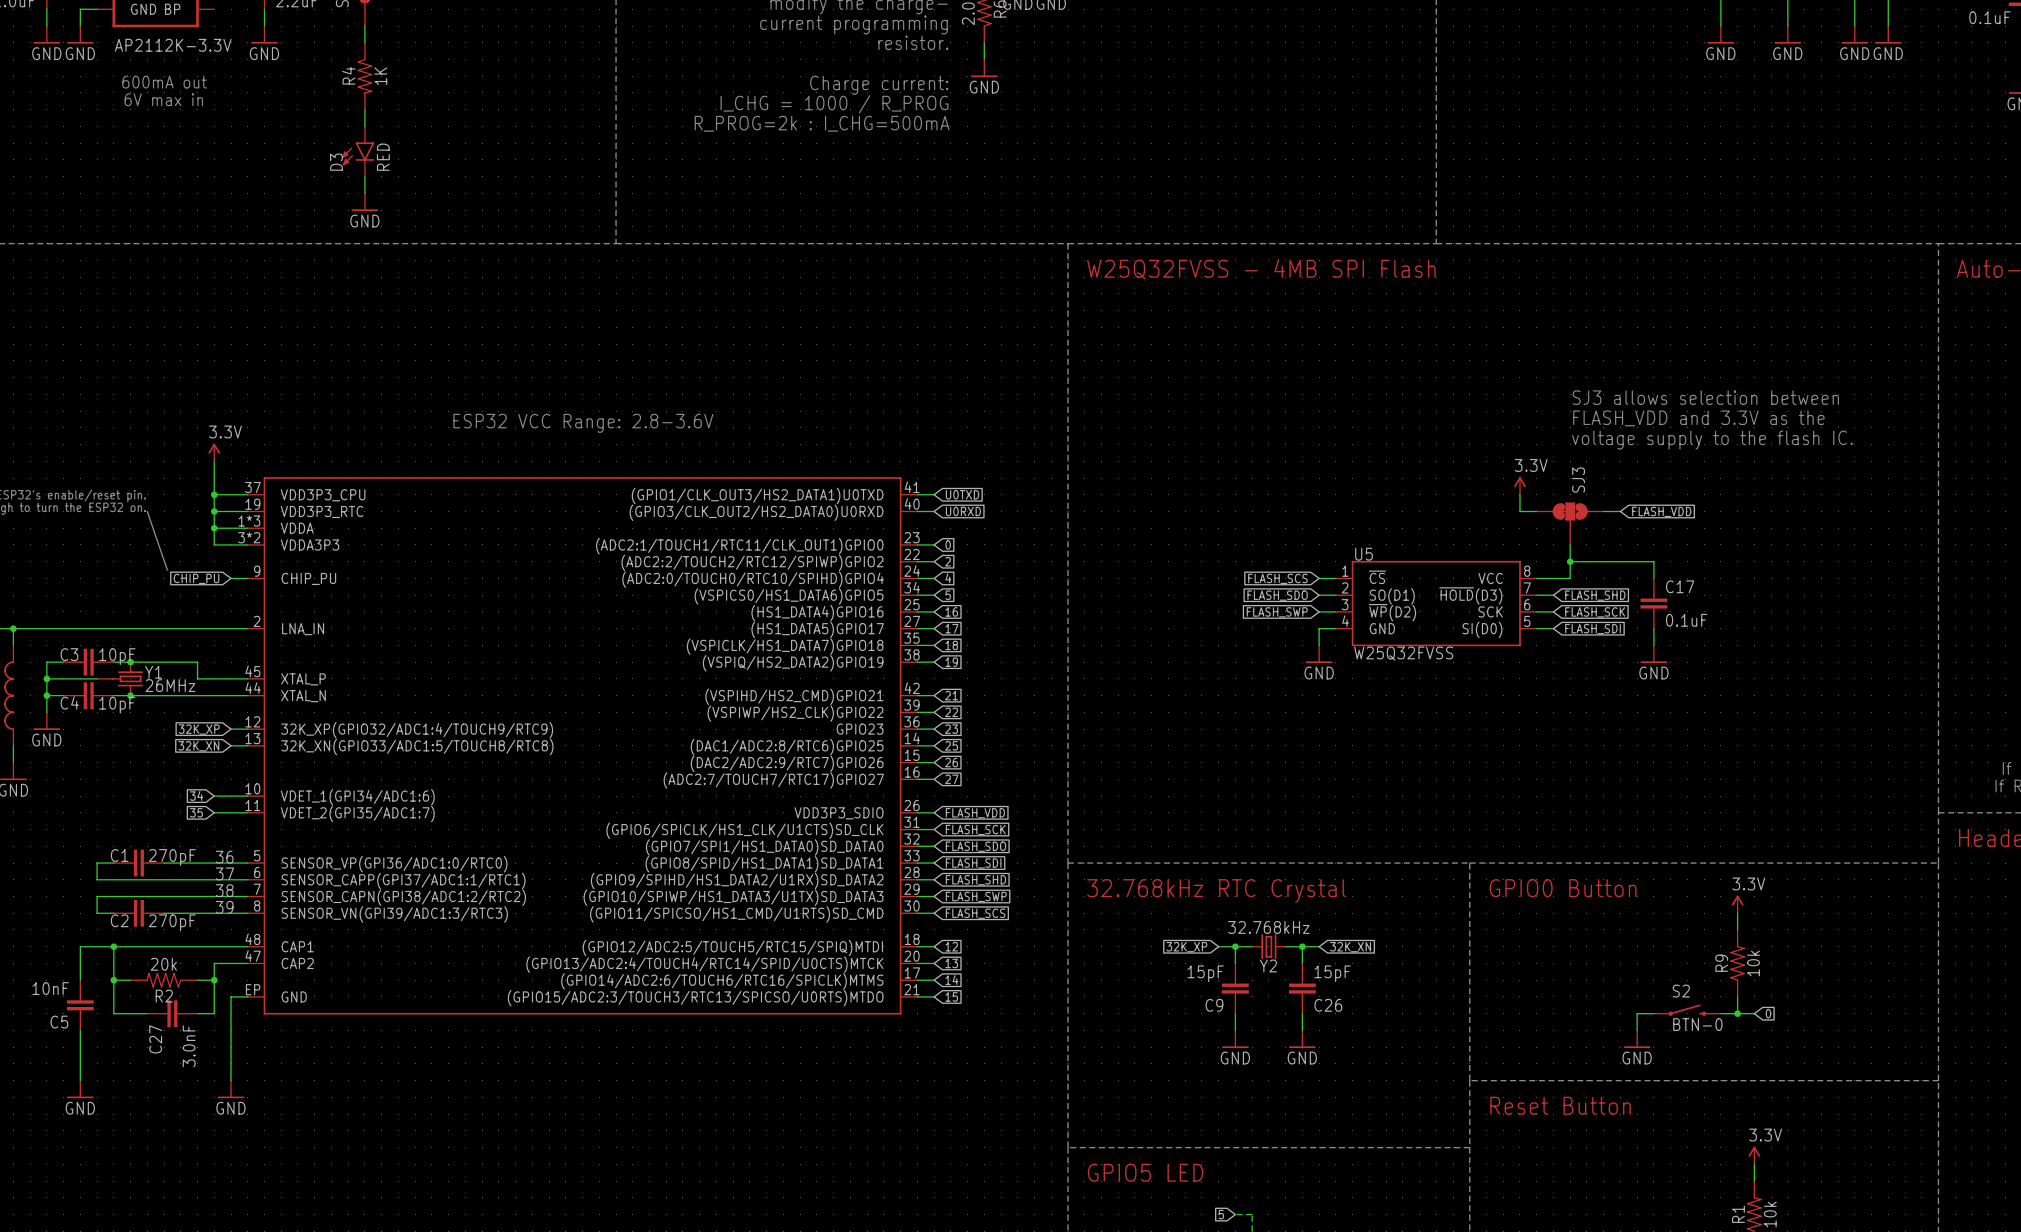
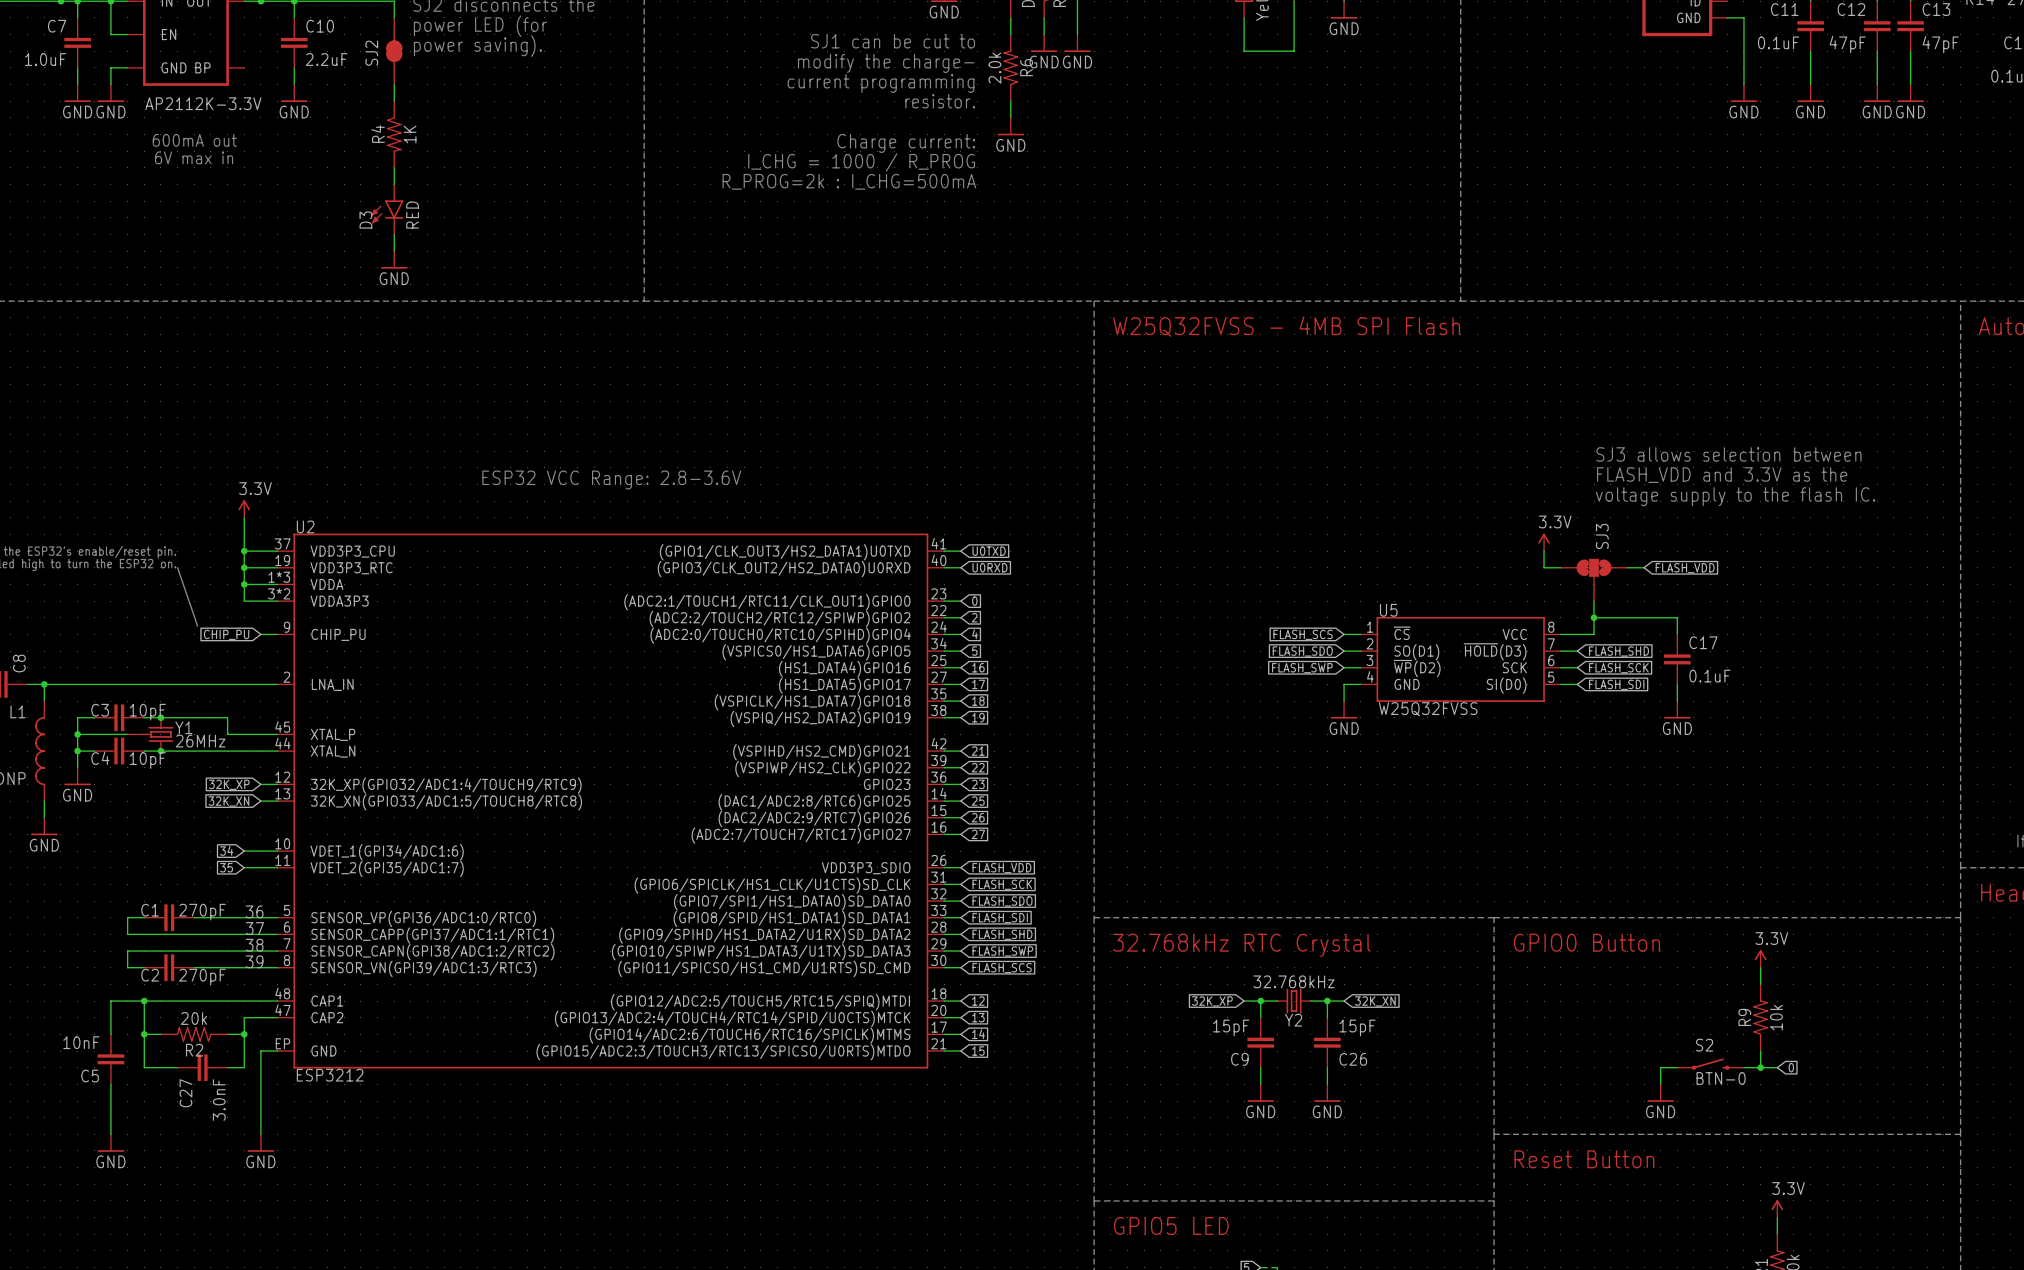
U2 name: none -> U2 (305, 526)
U2 value: none -> ESP3212 (330, 1075)

